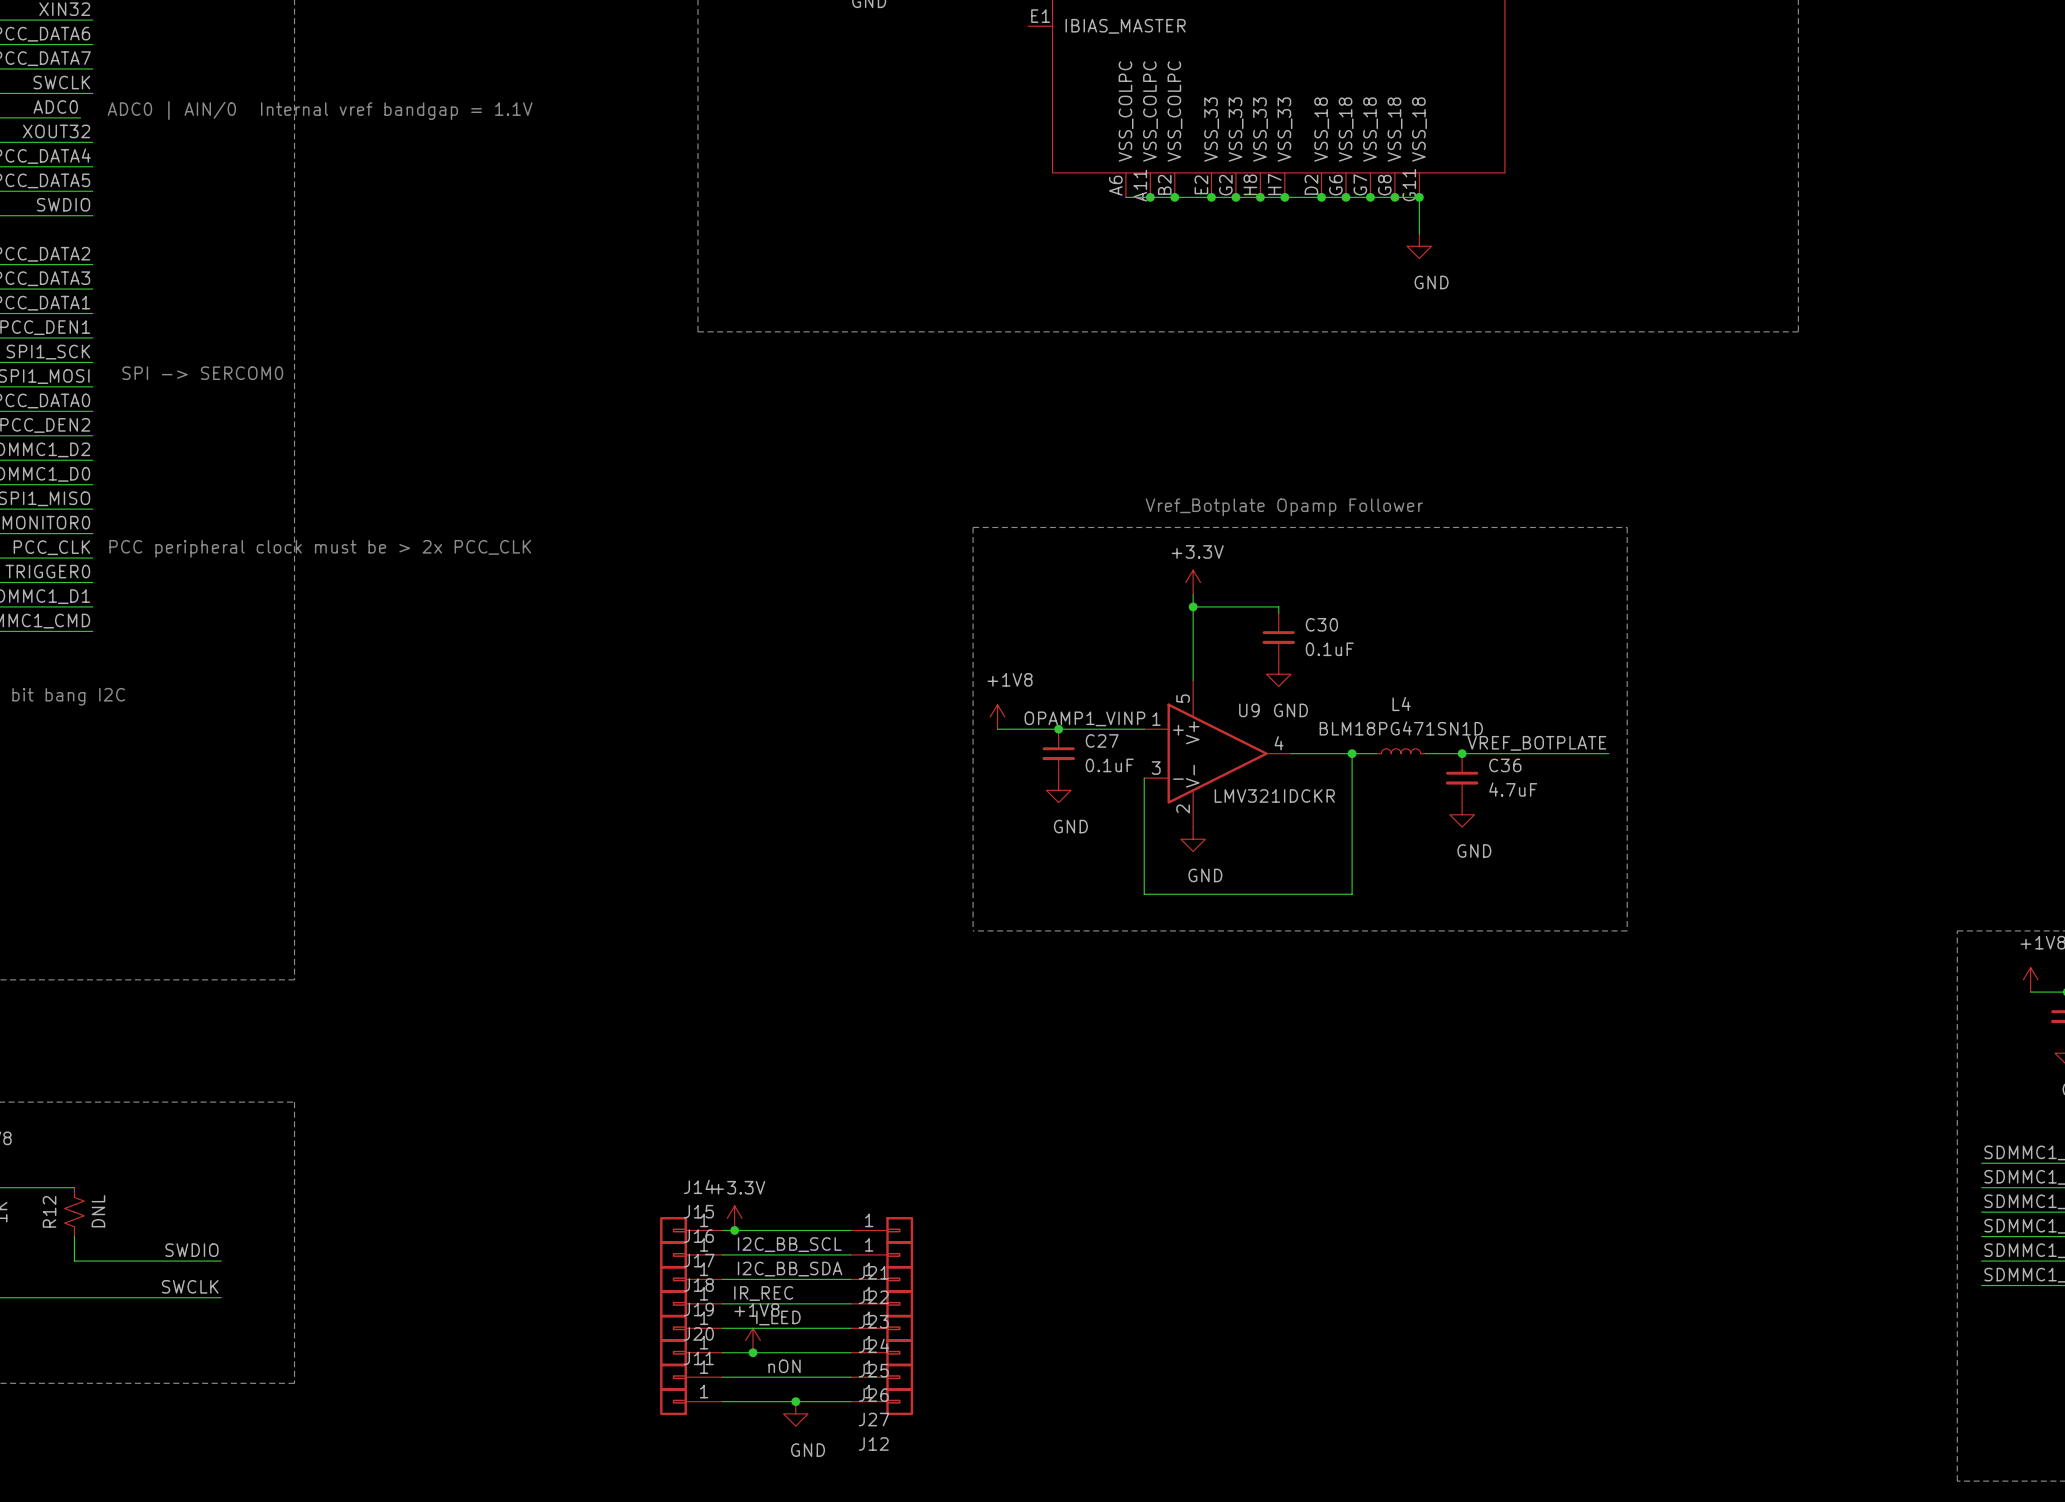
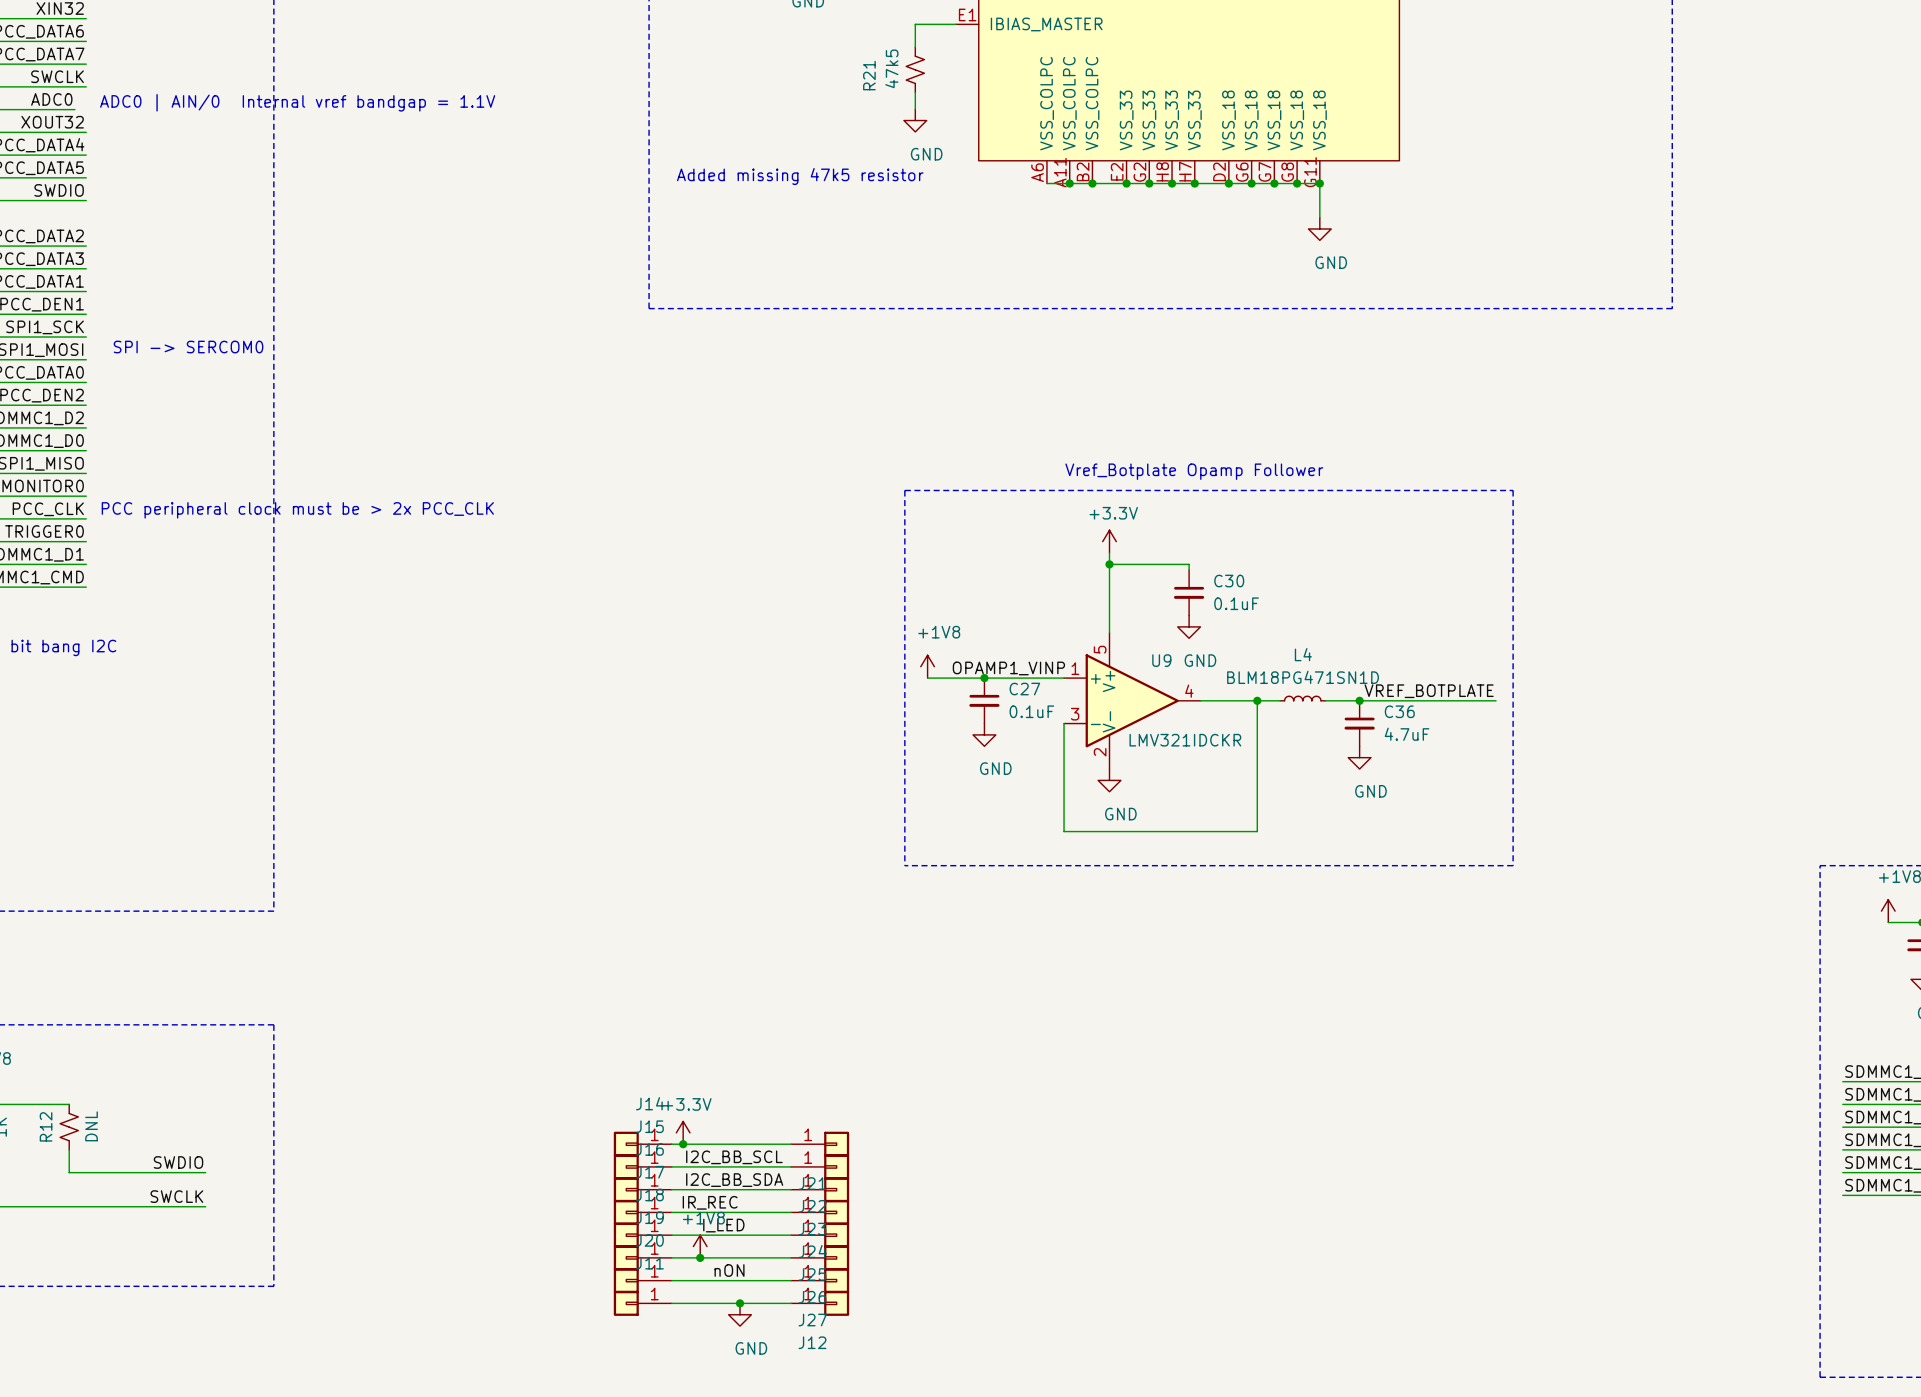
wire: none -> (956, 24) (915, 24) (915, 47)
R21: none -> 47k5 (915, 69)
wire: none -> (915, 92) (915, 109)
power symbol: none -> GND (915, 120)
text: none -> Added missing 47k5 resistor (800, 176)

